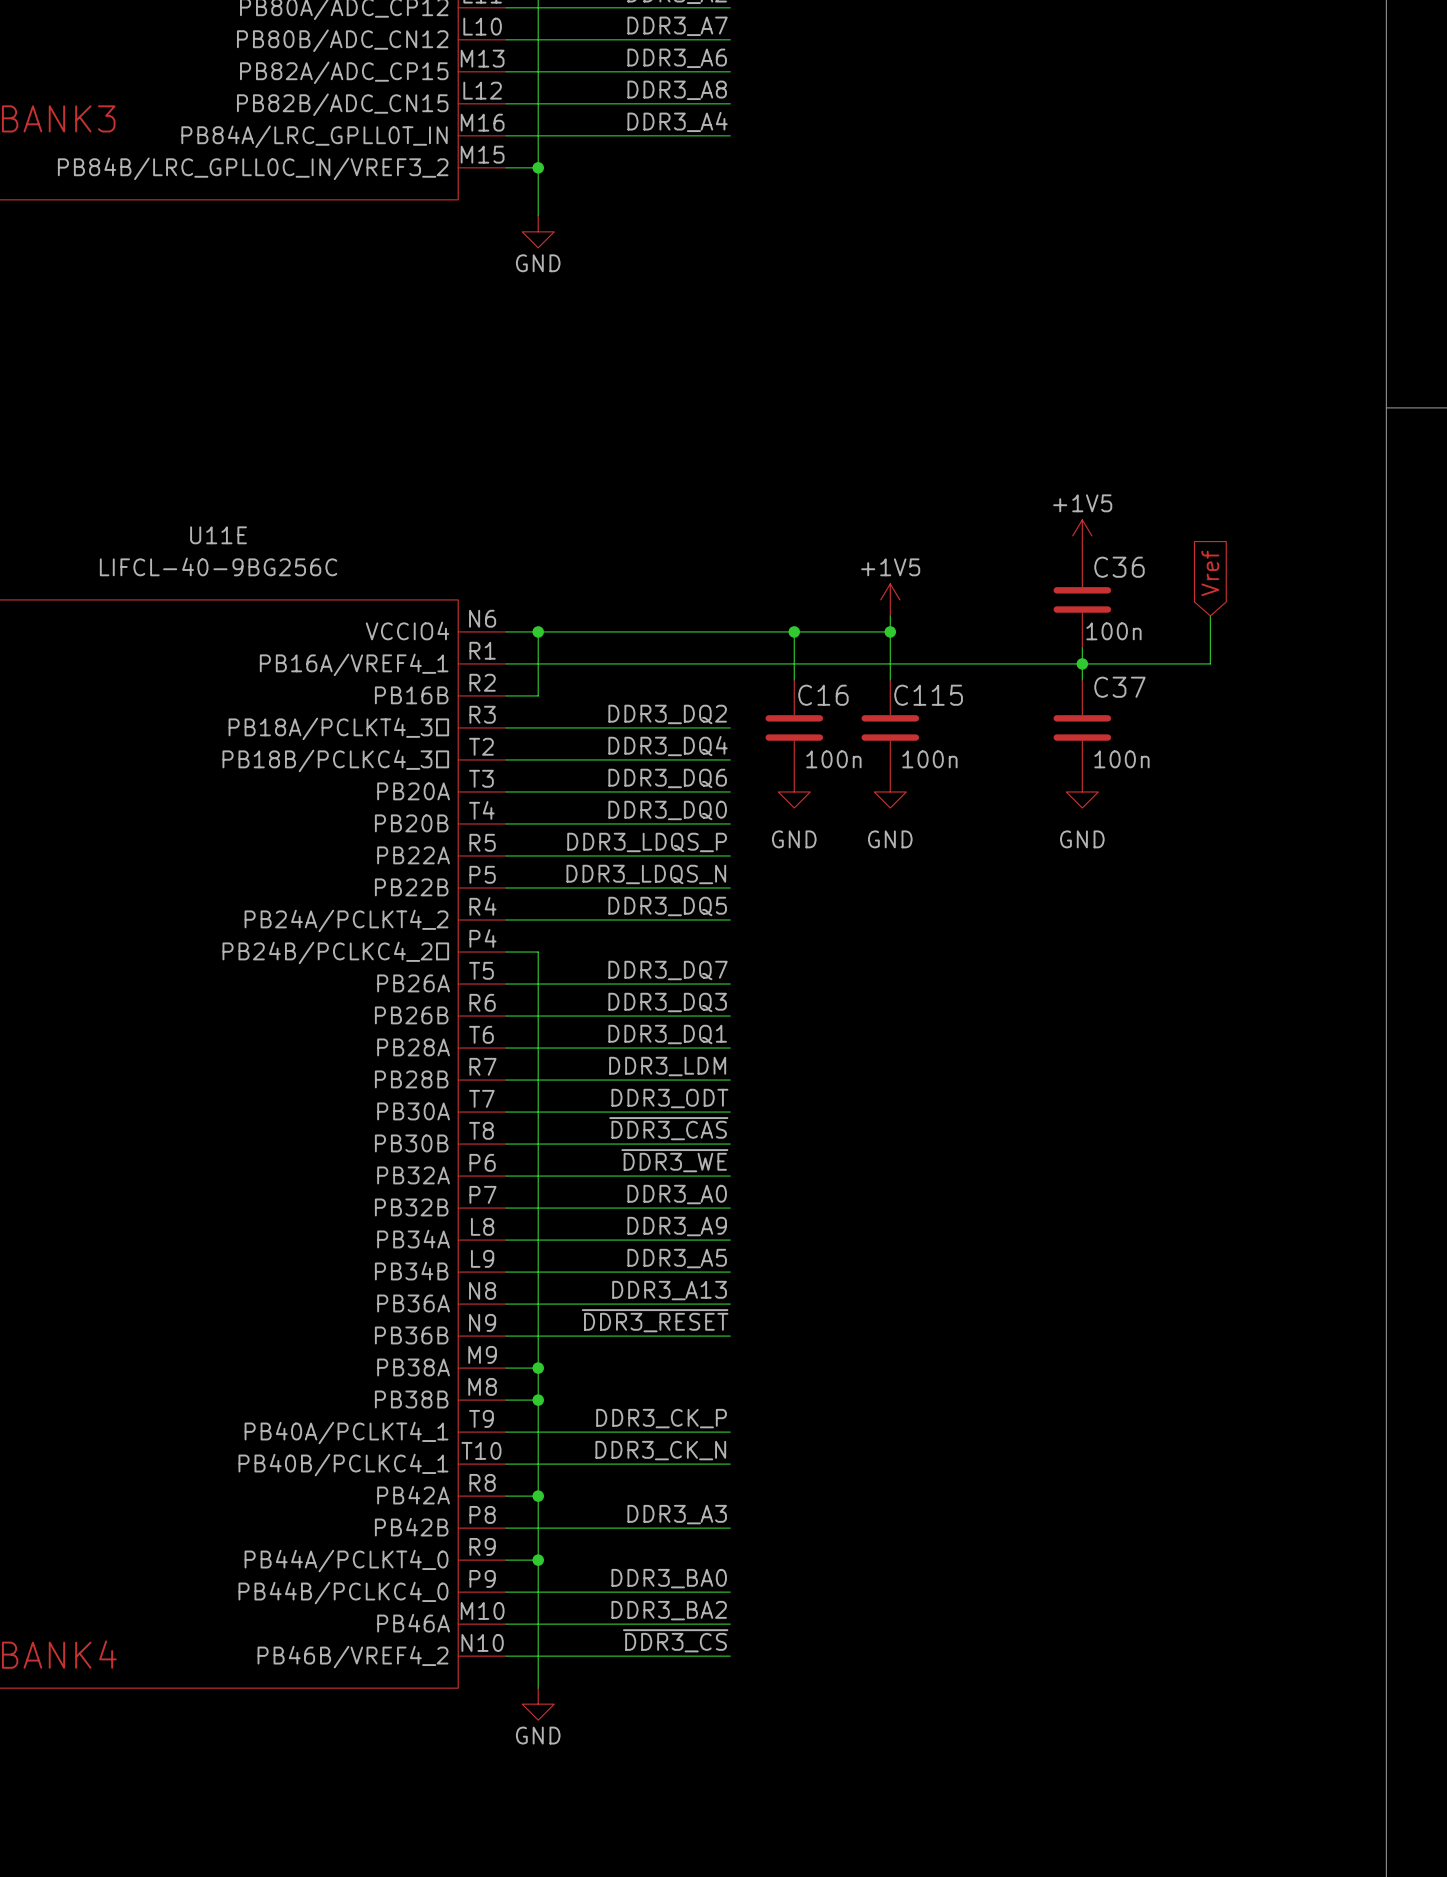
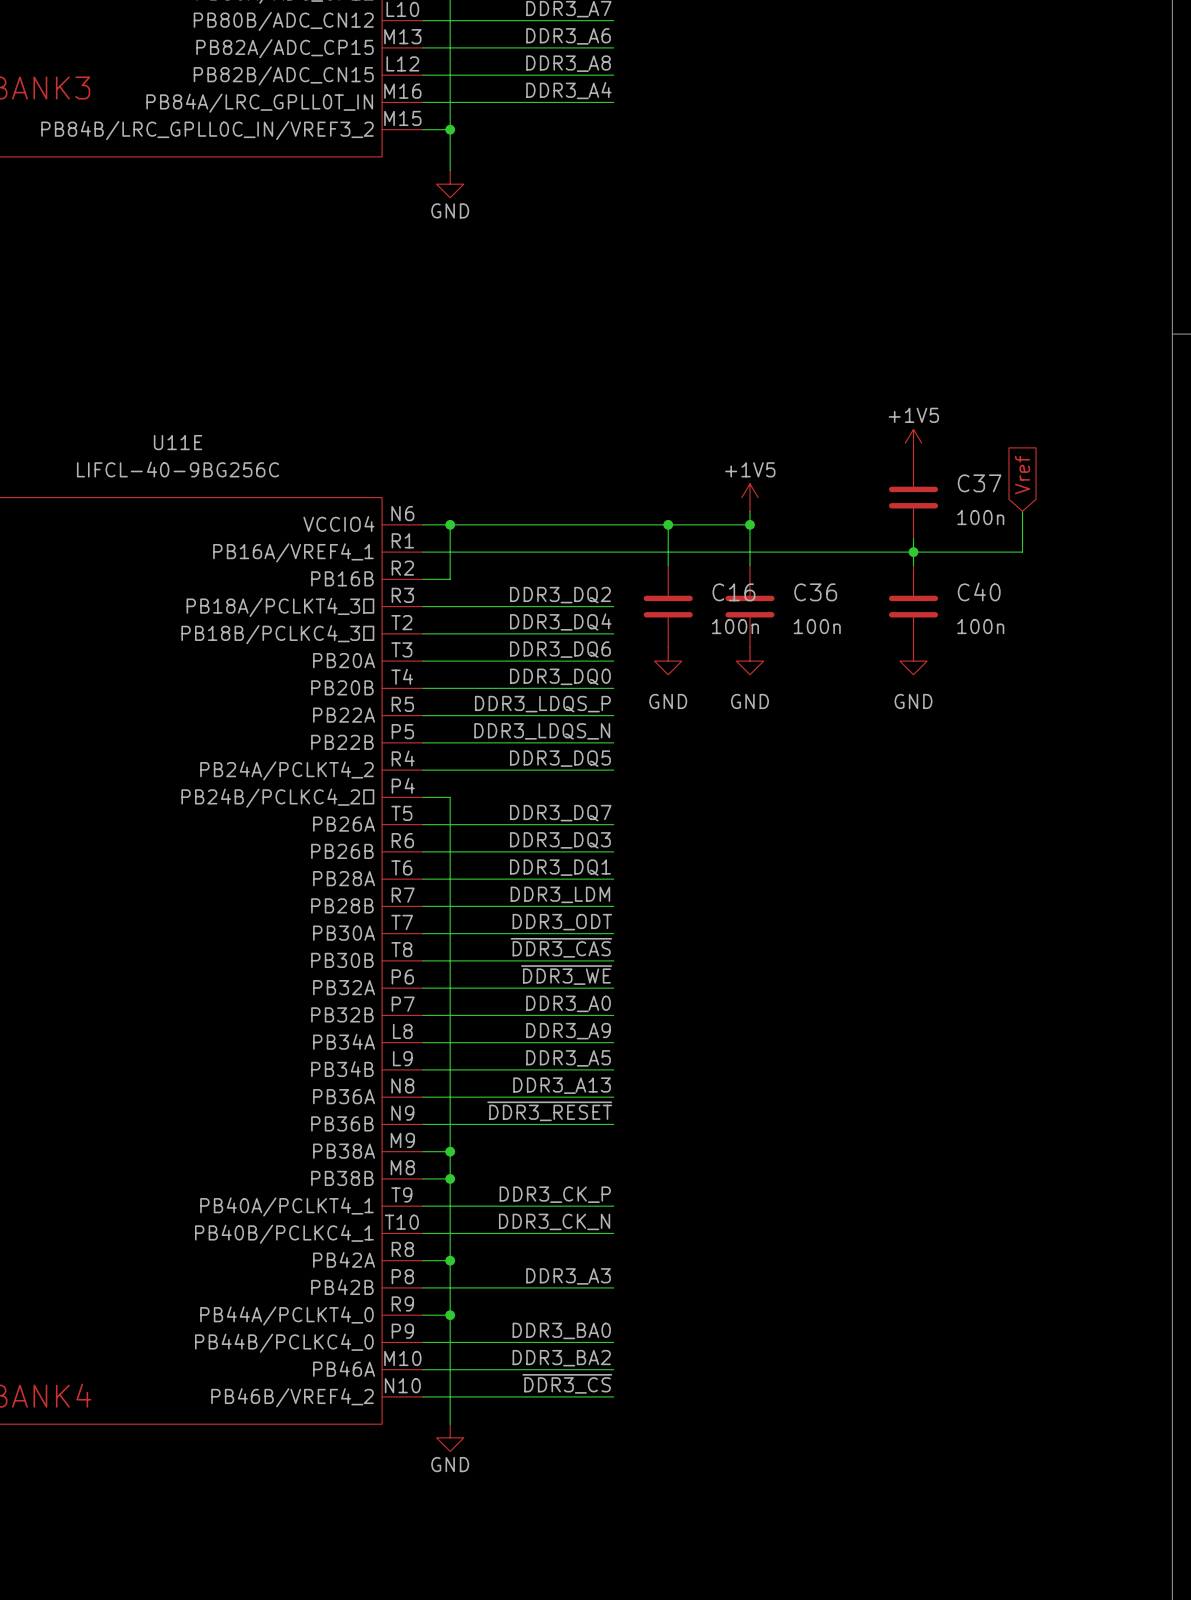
C36 name: C36 (1119, 567) -> C37 (979, 483)
C36 text position: 100n (1113, 631) -> 100n (980, 517)
C37 name: C37 (1119, 687) -> C40 (979, 591)
C16 name position: C16 (823, 695) -> C16 (733, 592)
C115 name: C115 (928, 695) -> C36 (815, 592)
C16 text position: 100n (833, 759) -> 100n (735, 626)
C115 text position: 100n (929, 759) -> 100n (817, 626)
C37 text position: 100n (1121, 759) -> 100n (980, 626)

